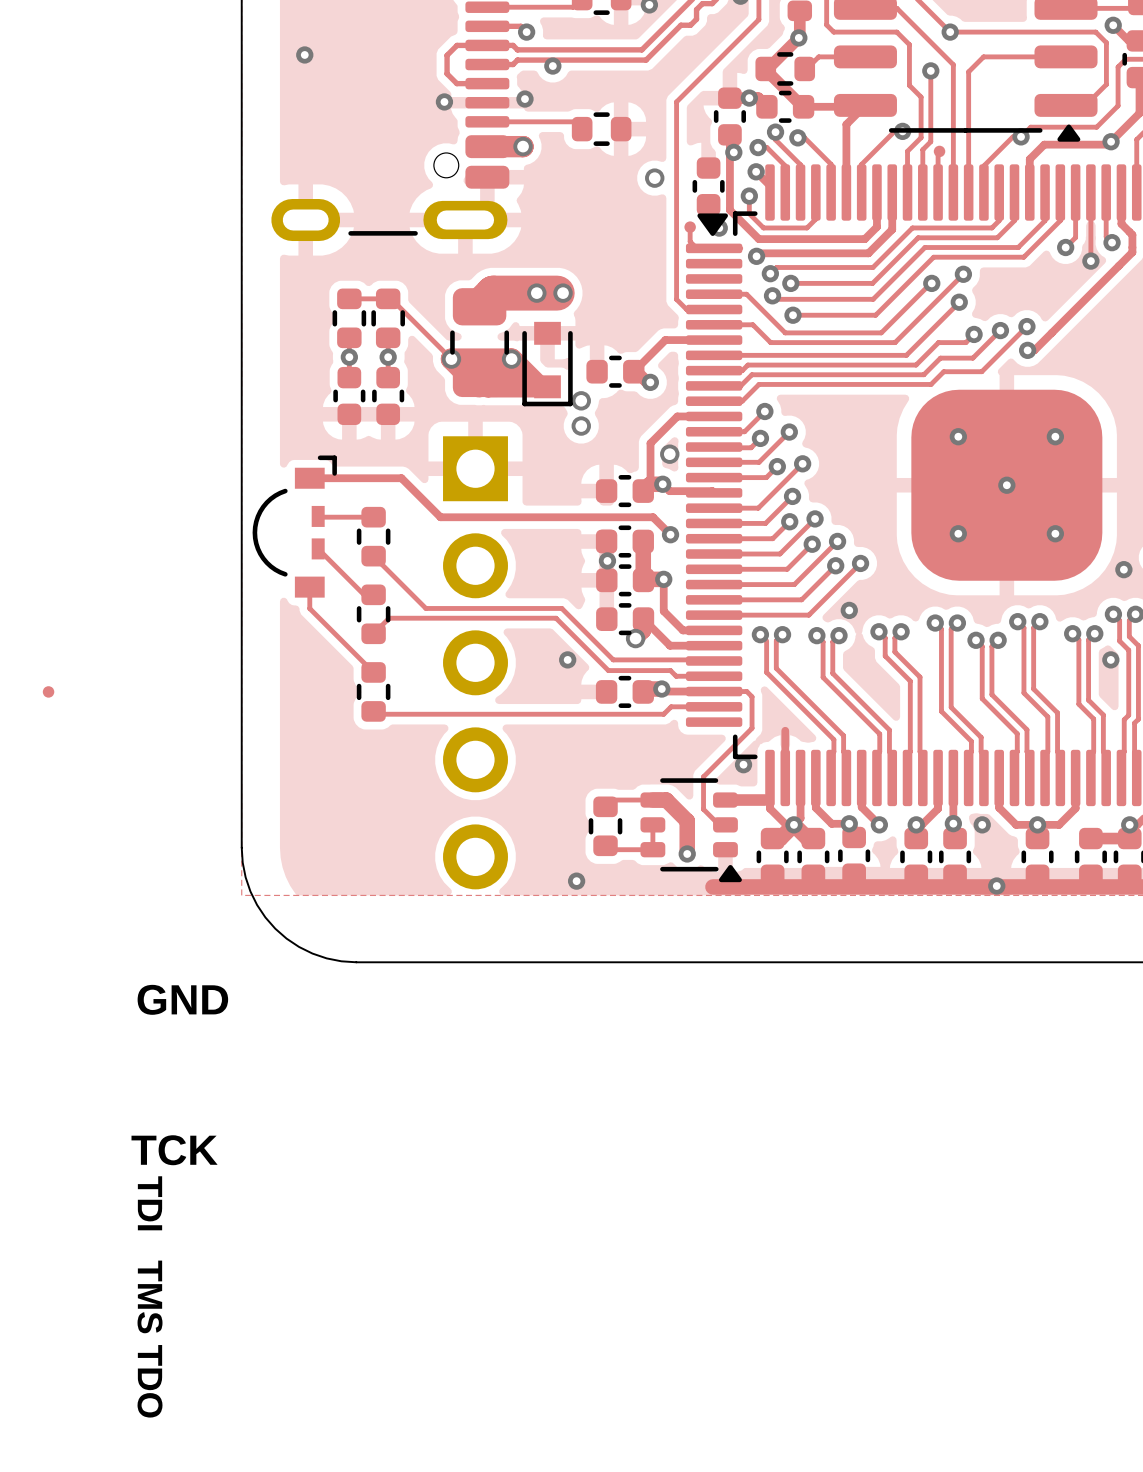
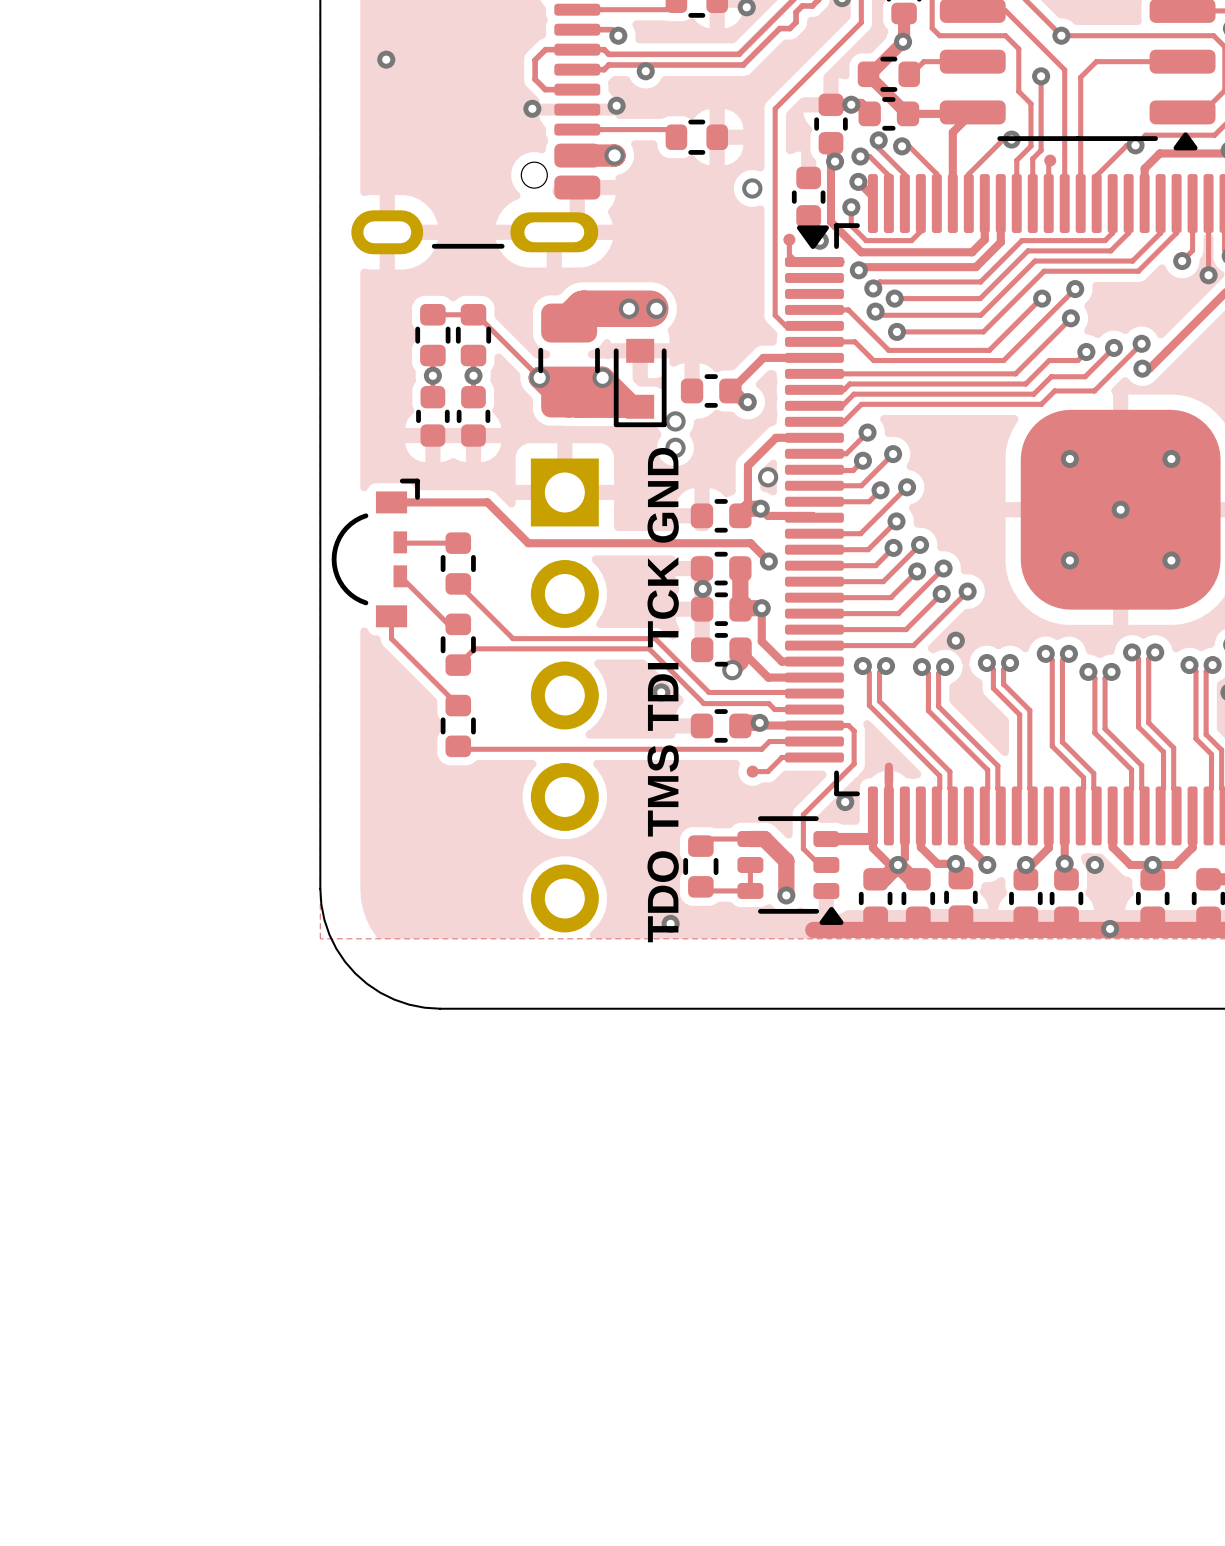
text: none -> TDO TMS TDI TCK GND (663, 695)
part position: (48, 691) -> (752, 771)
track: none -> (814, 757) (781, 757) (767, 771) (752, 771)
text: GND (182, 999) -> none
text: TCK (174, 1150) -> none
text: TDI (150, 1203) -> none
text: TMS (150, 1296) -> none
text: TDO (150, 1381) -> none

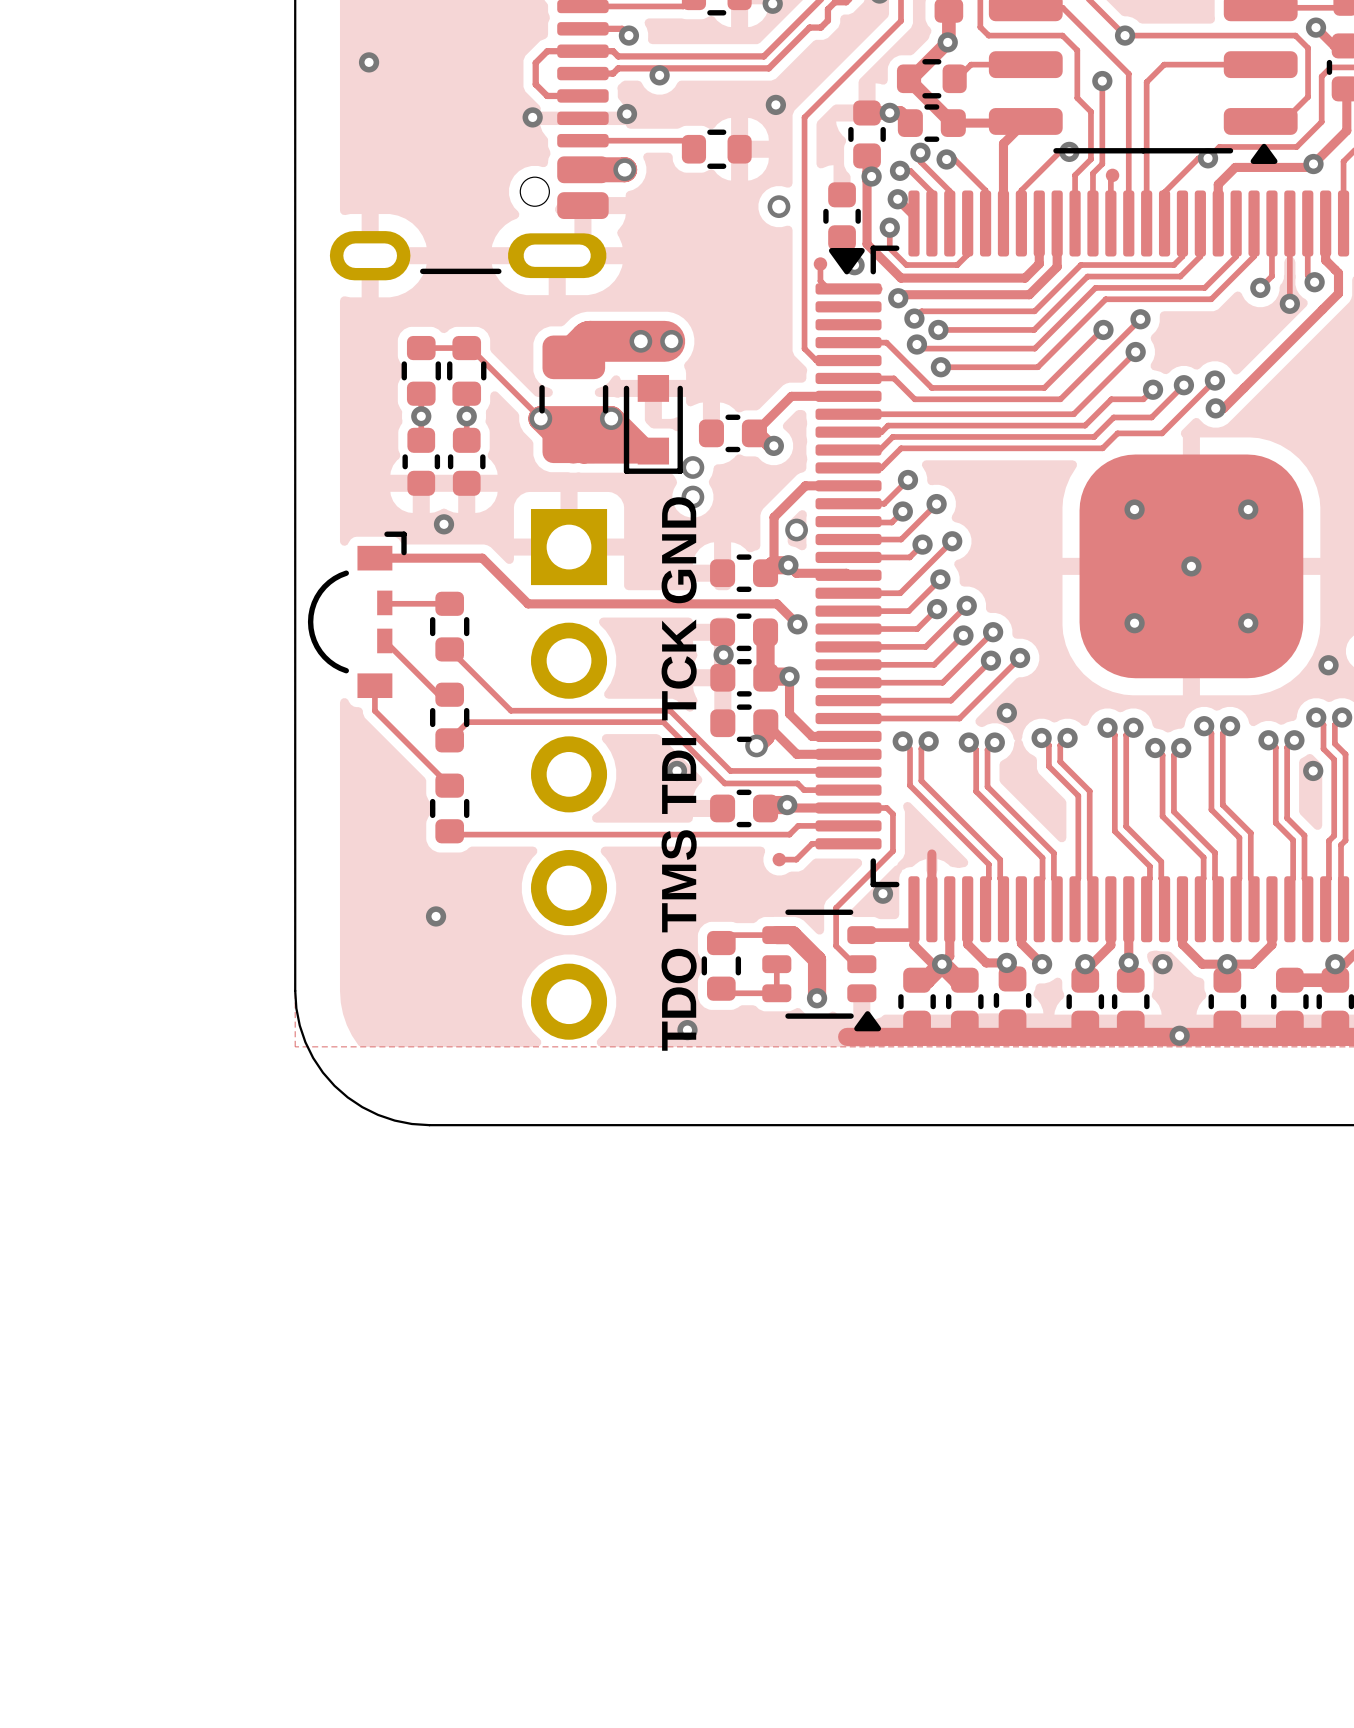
via: none -> (775, 104)
via: none -> (444, 524)
via: none -> (436, 916)

